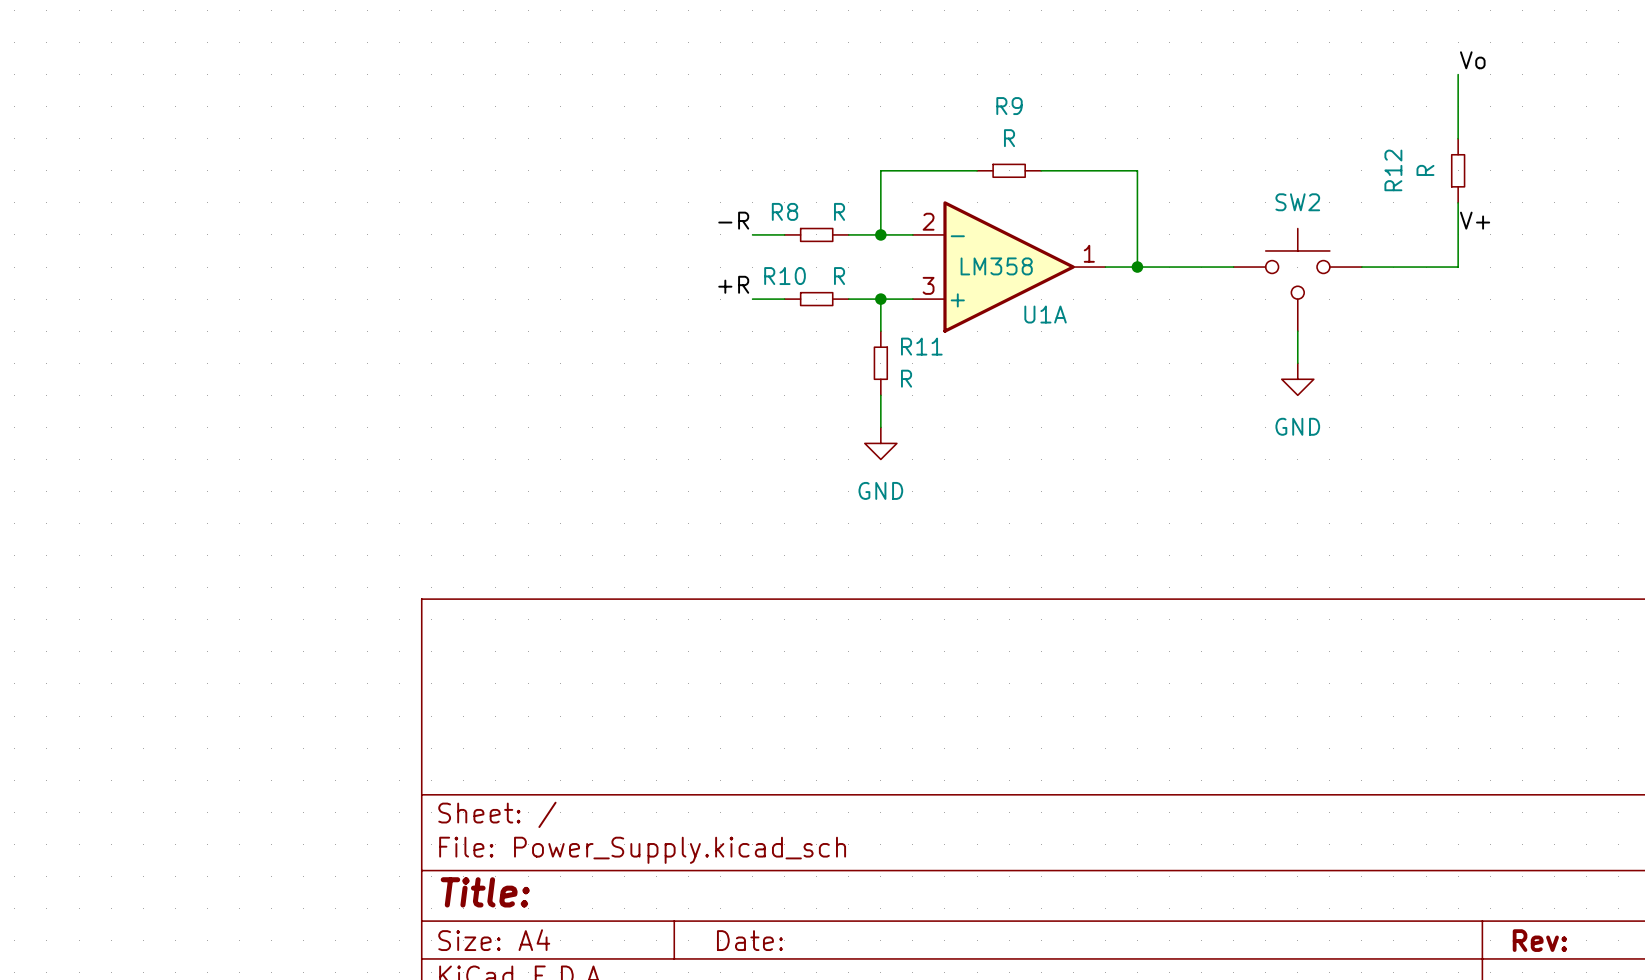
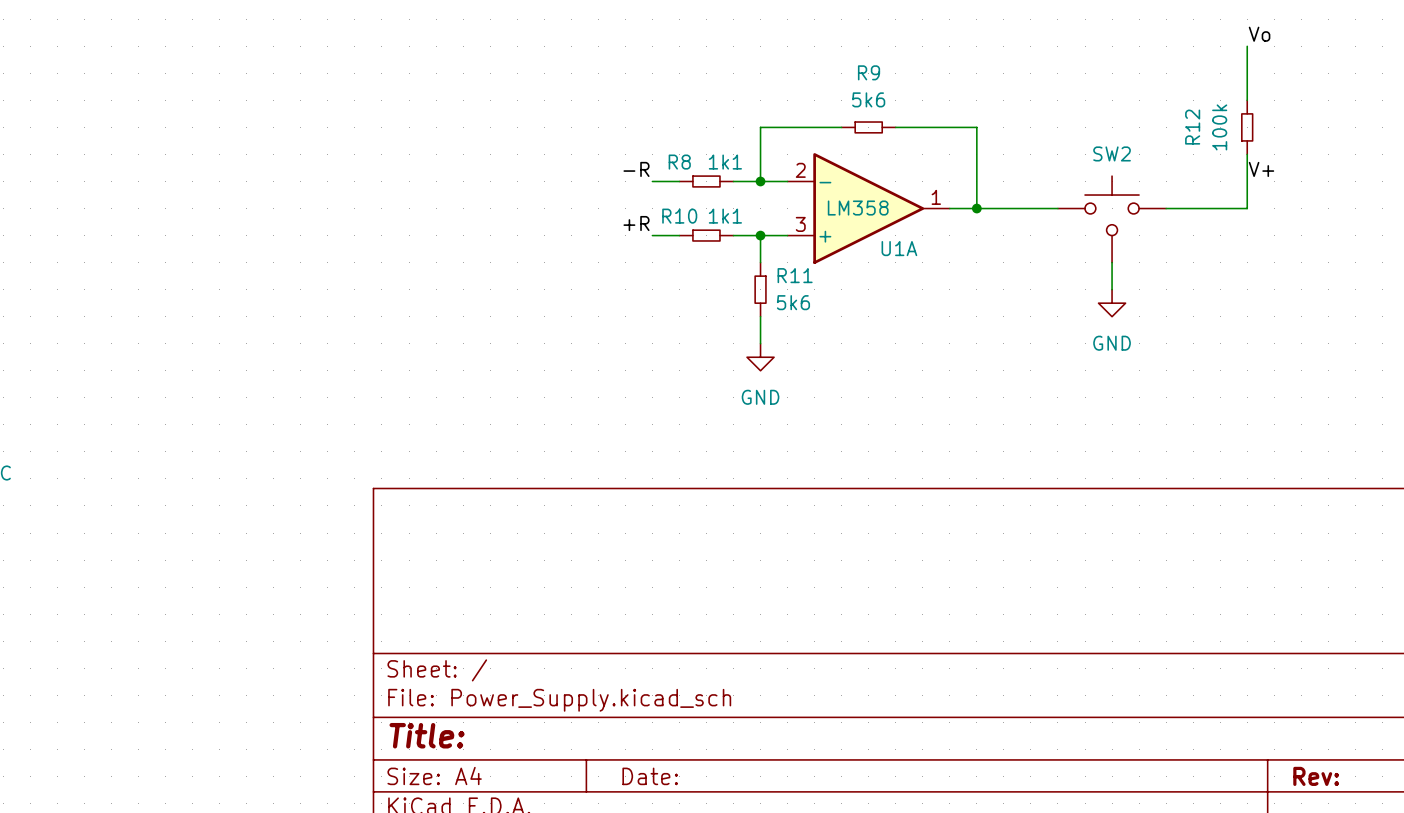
R9 value: R (1009, 138) -> 5k6 (868, 99)
R12 value: R (1425, 170) -> 100k (1219, 127)
R8 value: R (839, 211) -> 1k1 (725, 162)
R10 value: R (839, 276) -> 1k1 (725, 216)
R11 value: R (906, 378) -> 5k6 (793, 302)

